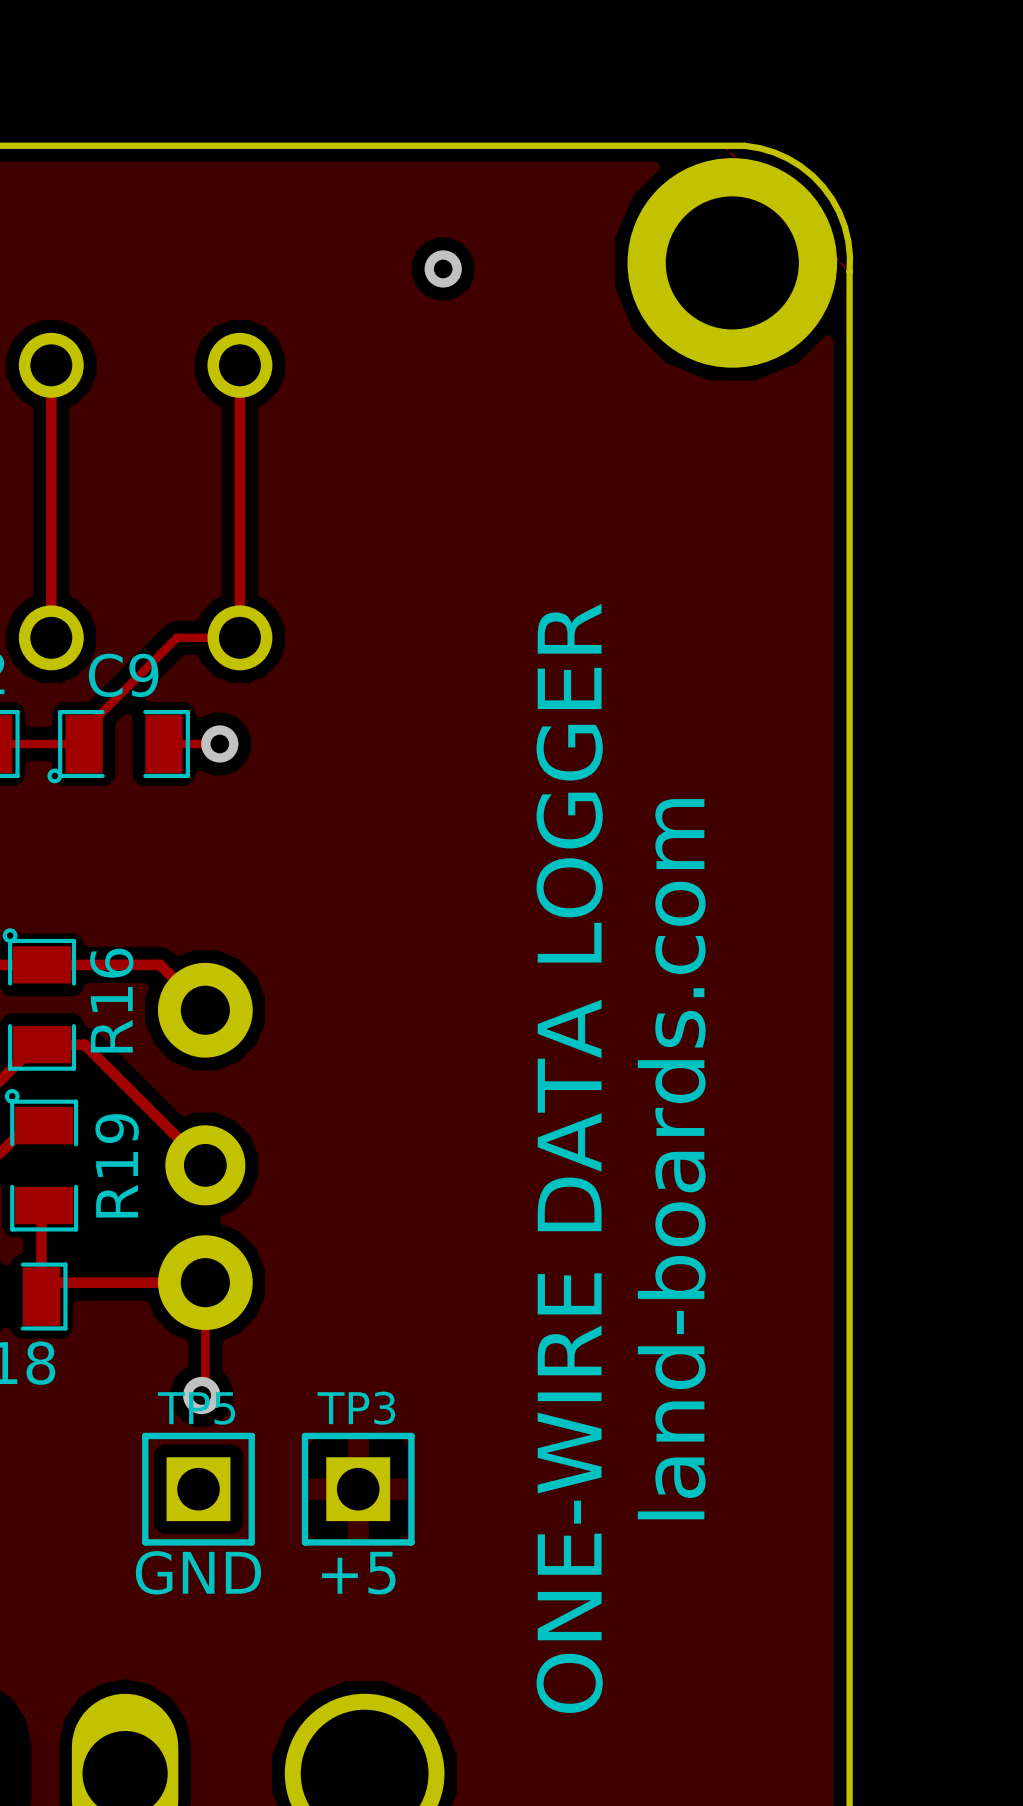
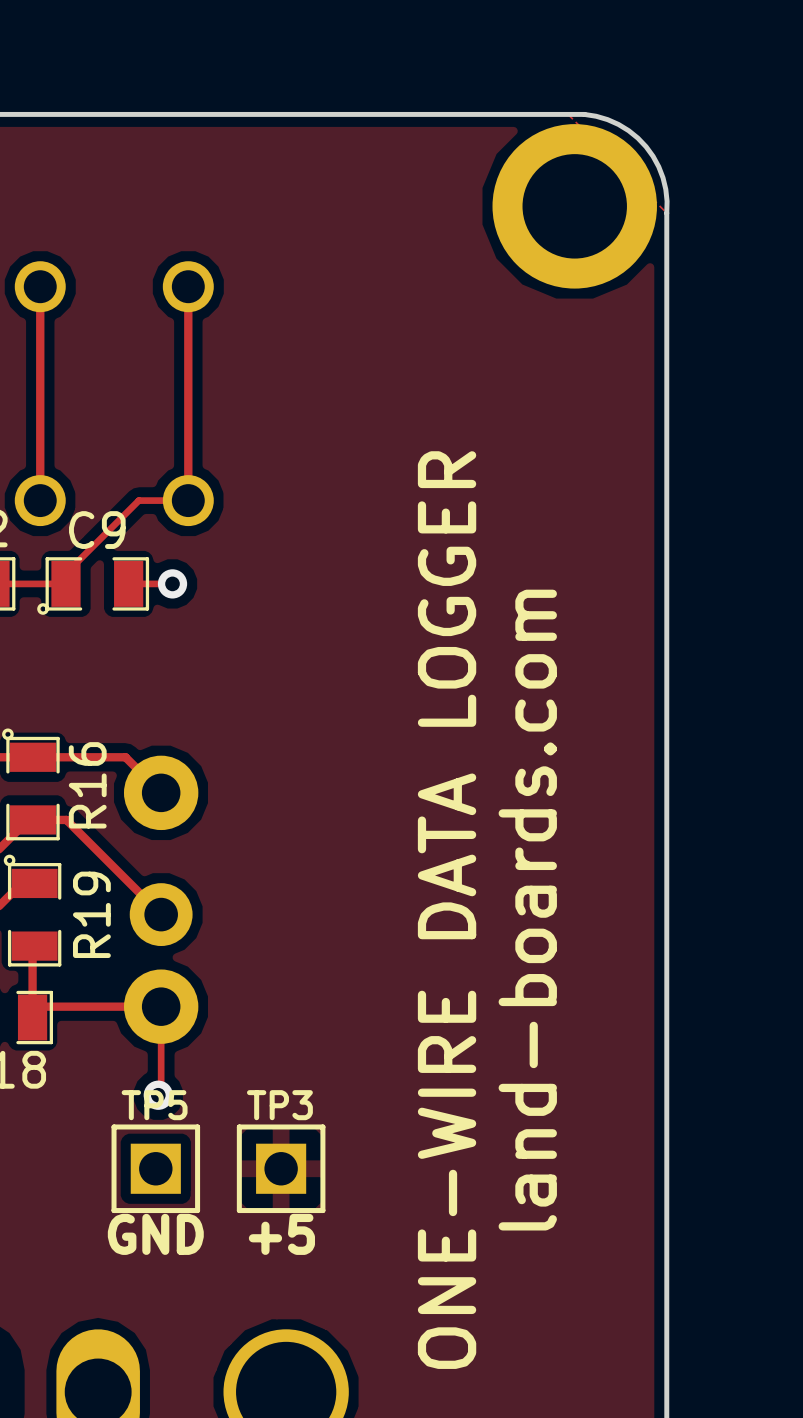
via: (443, 268) -> none

